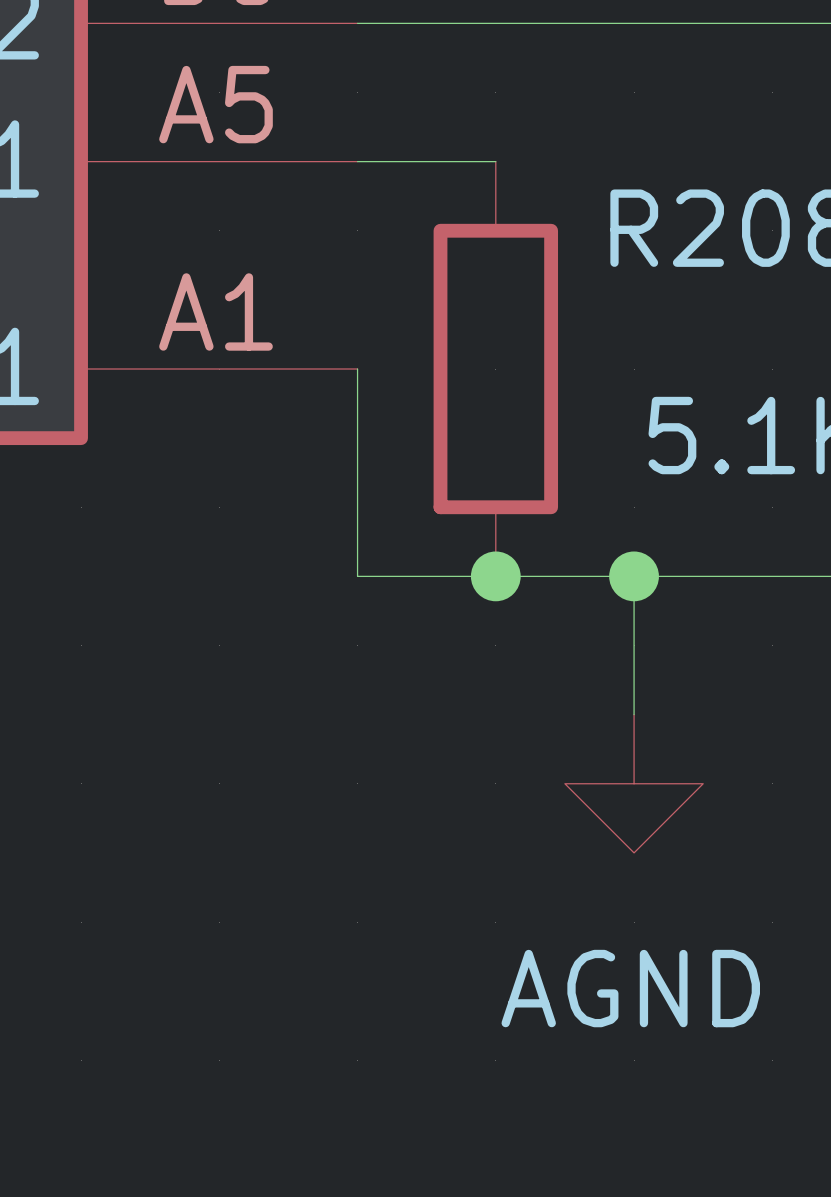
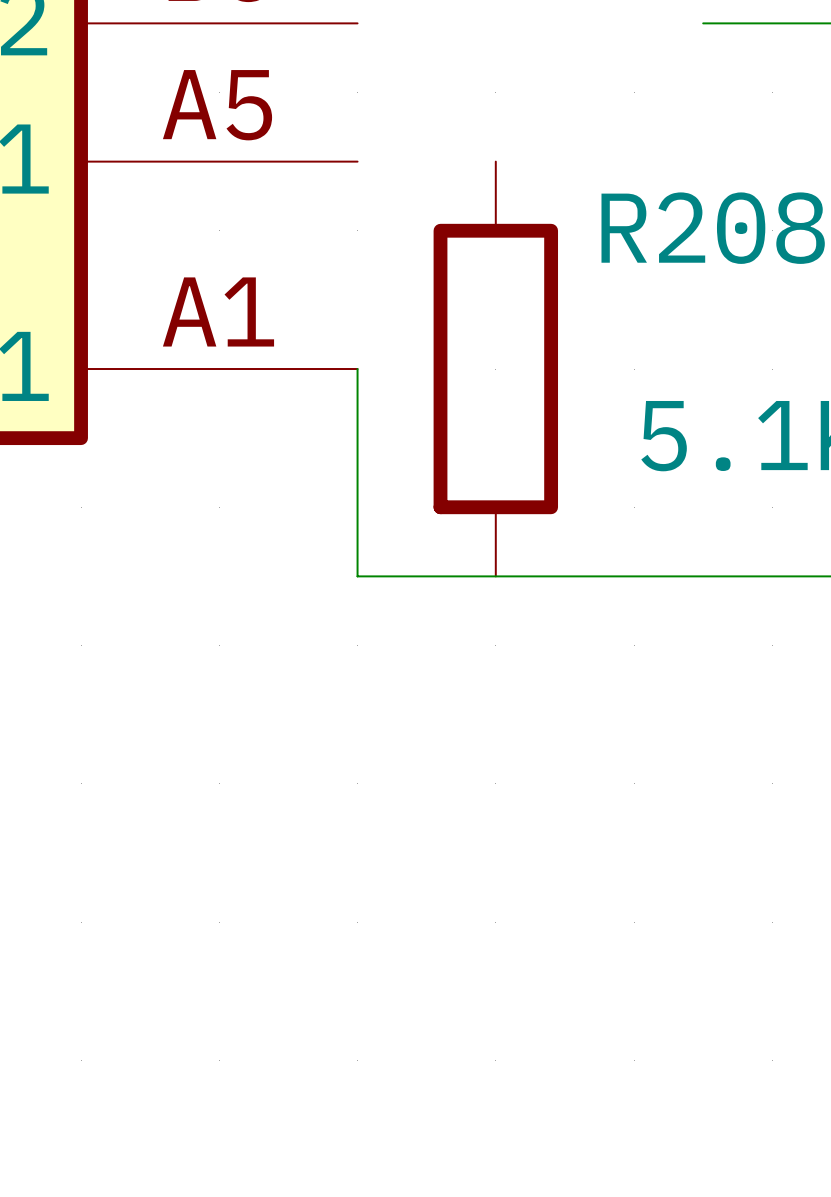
wire: (357, 23) (703, 23) -> none
wire: (357, 161) (495, 161) -> none
junction: (495, 576) -> none
wire: (634, 576) (634, 714) -> none
junction: (634, 576) -> none
power symbol: AGND (634, 783) -> none

